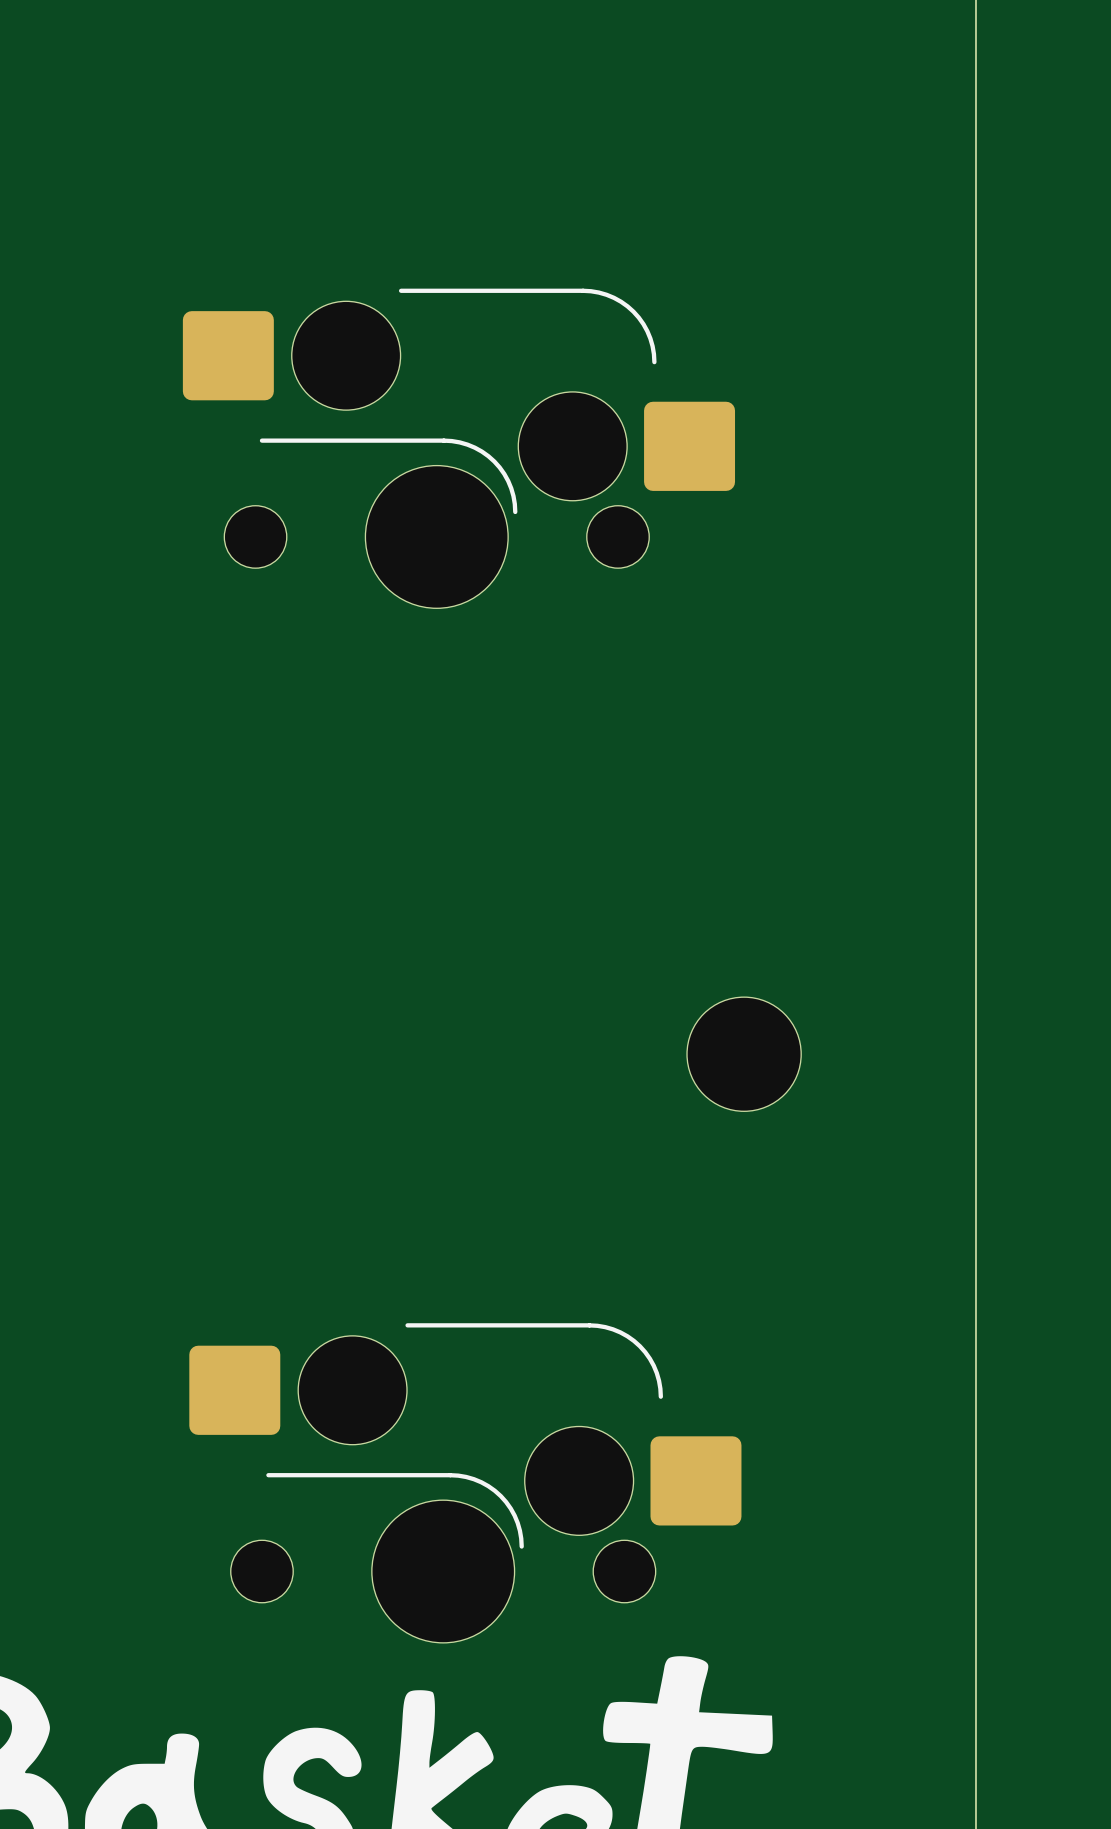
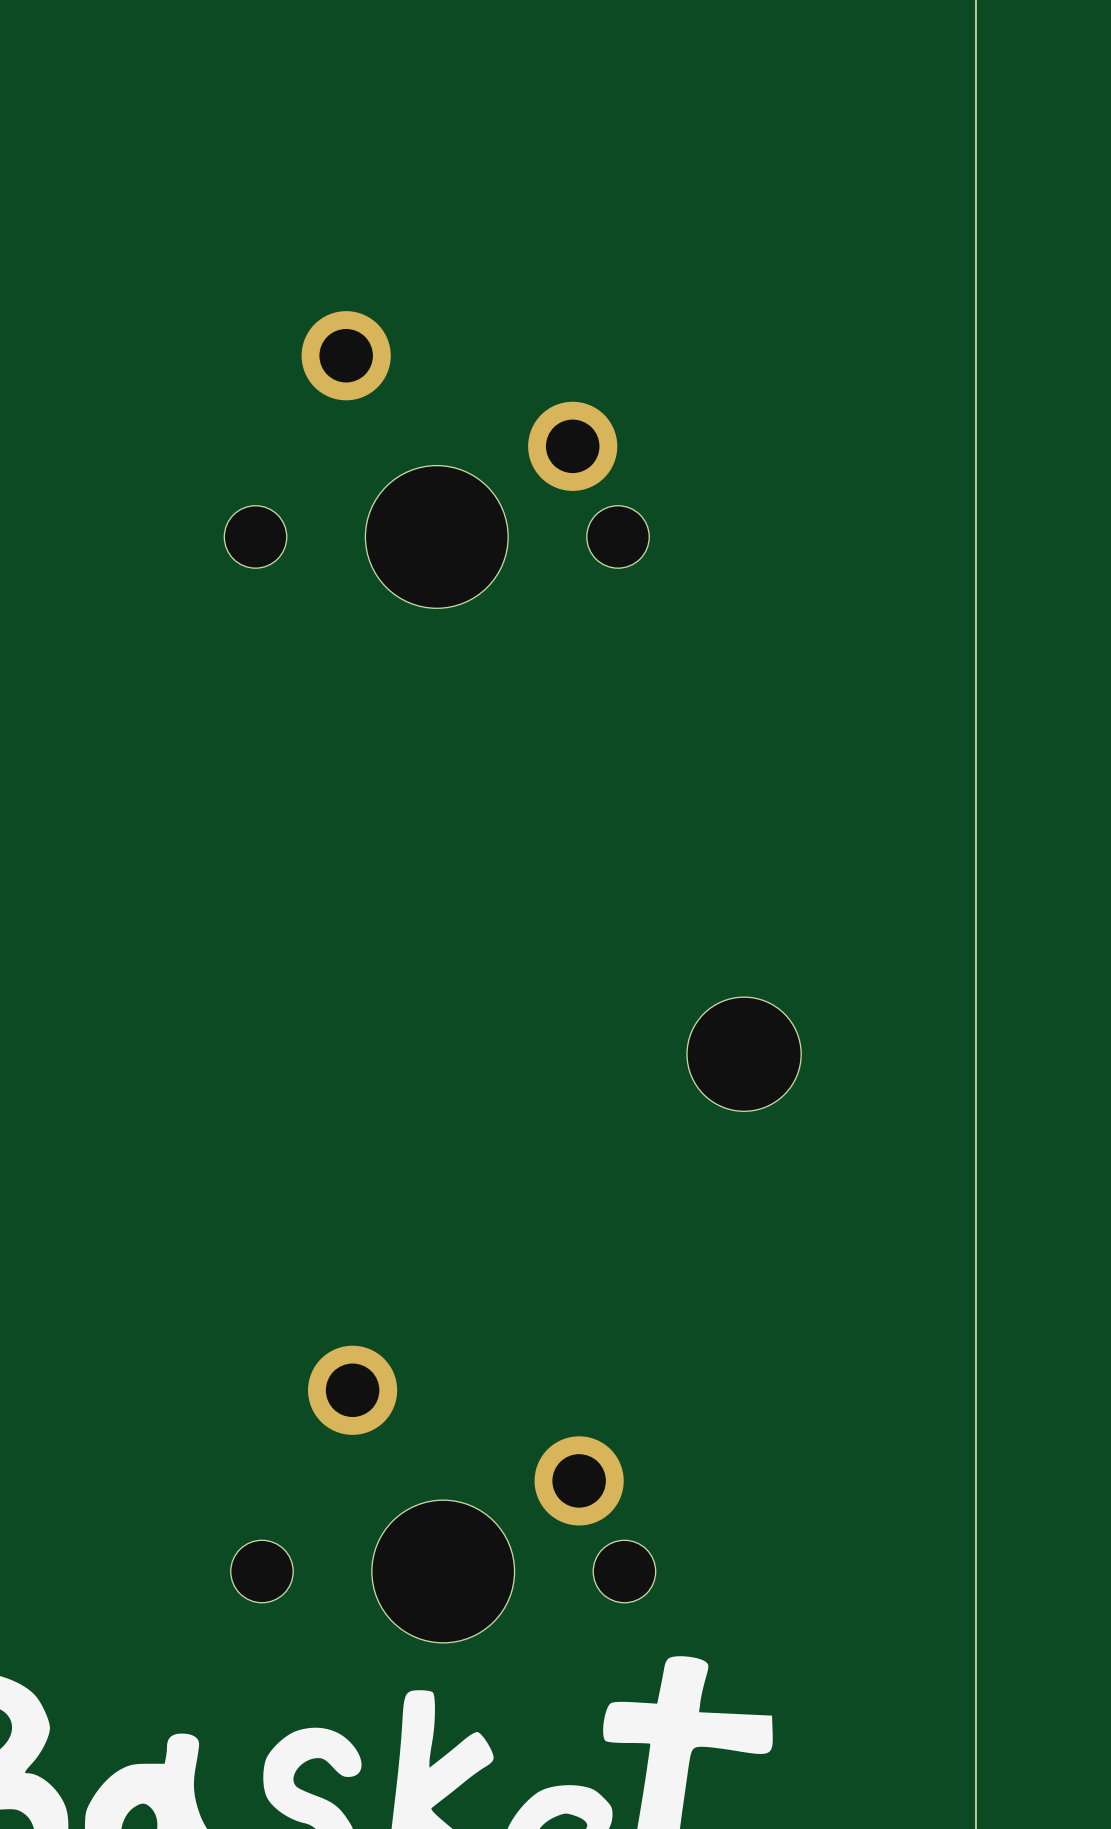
part footprint: [182, 288, 736, 609] -> [224, 311, 650, 609]
part footprint: [189, 1323, 742, 1643] -> [230, 1345, 656, 1643]

